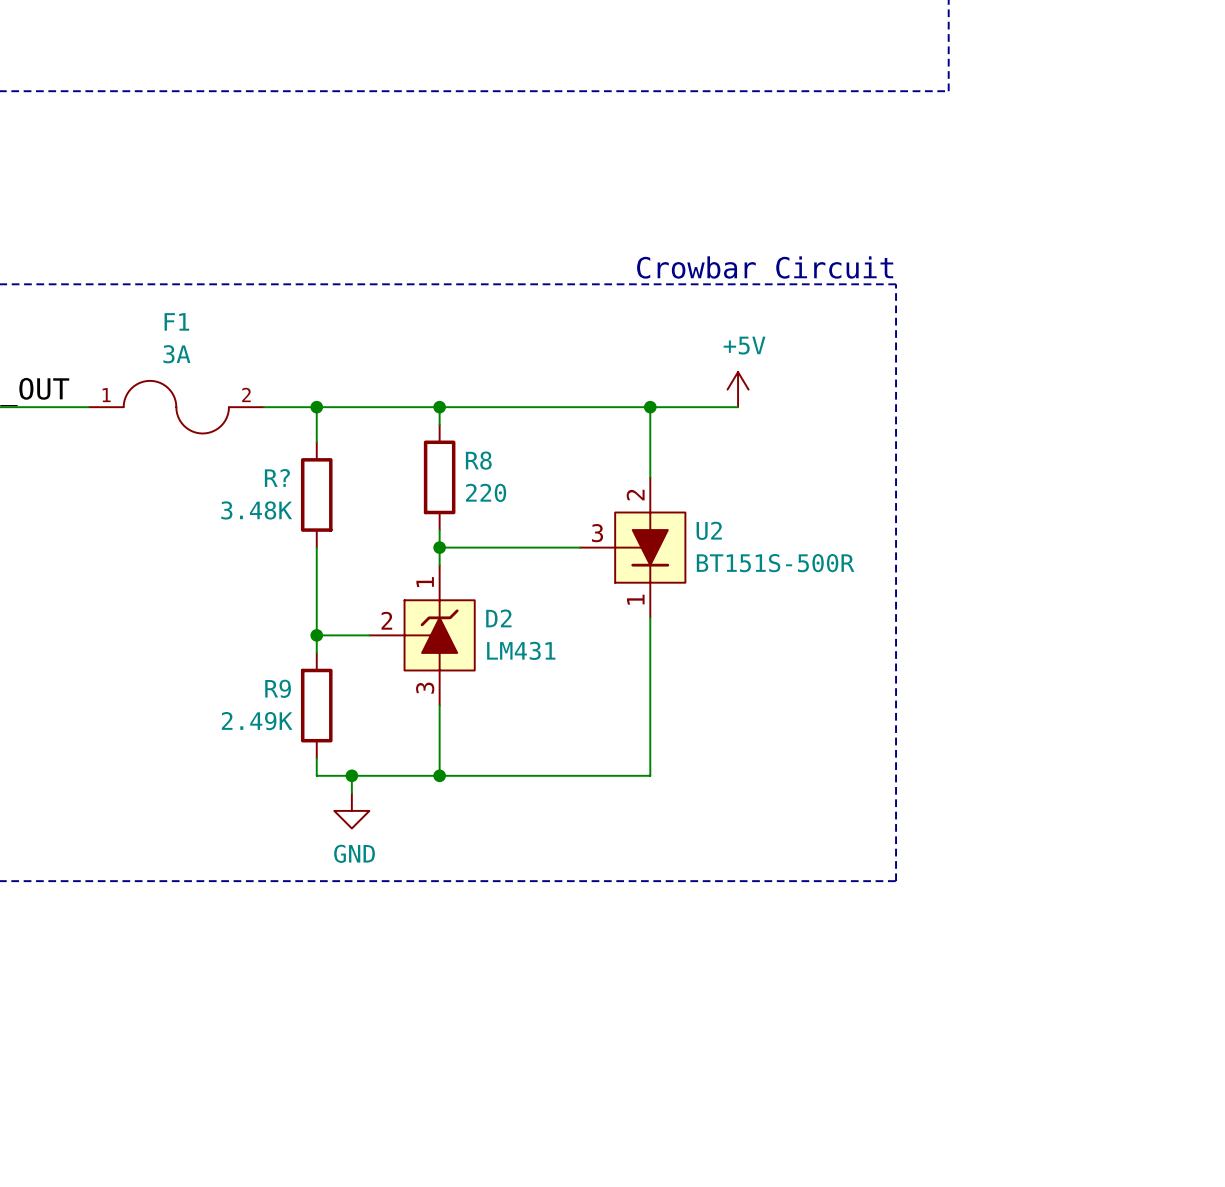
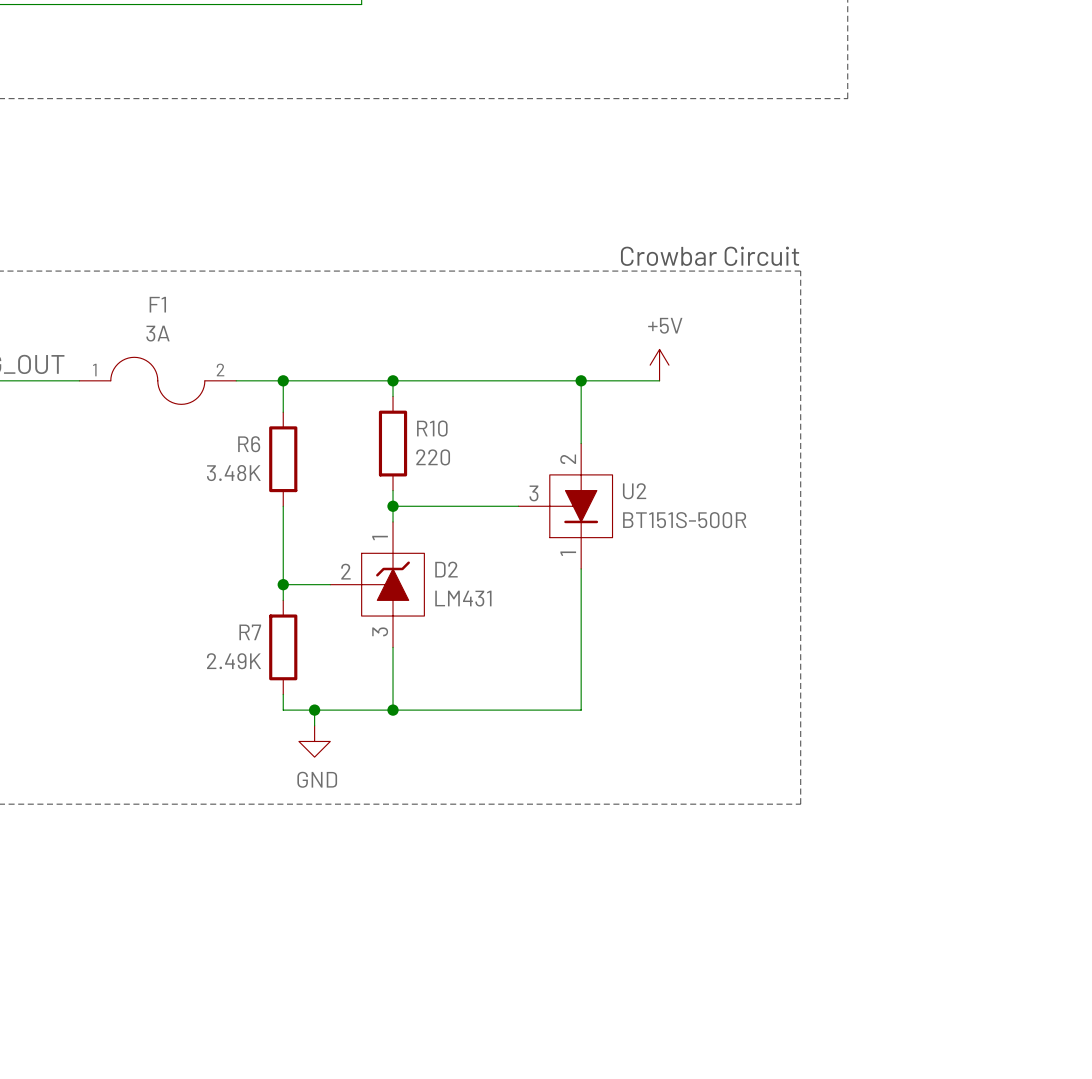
R8 name: R8 (478, 460) -> R10 (432, 428)
R? name: R? (277, 477) -> R6 (249, 444)
R9 name: R9 (278, 688) -> R7 (250, 632)

